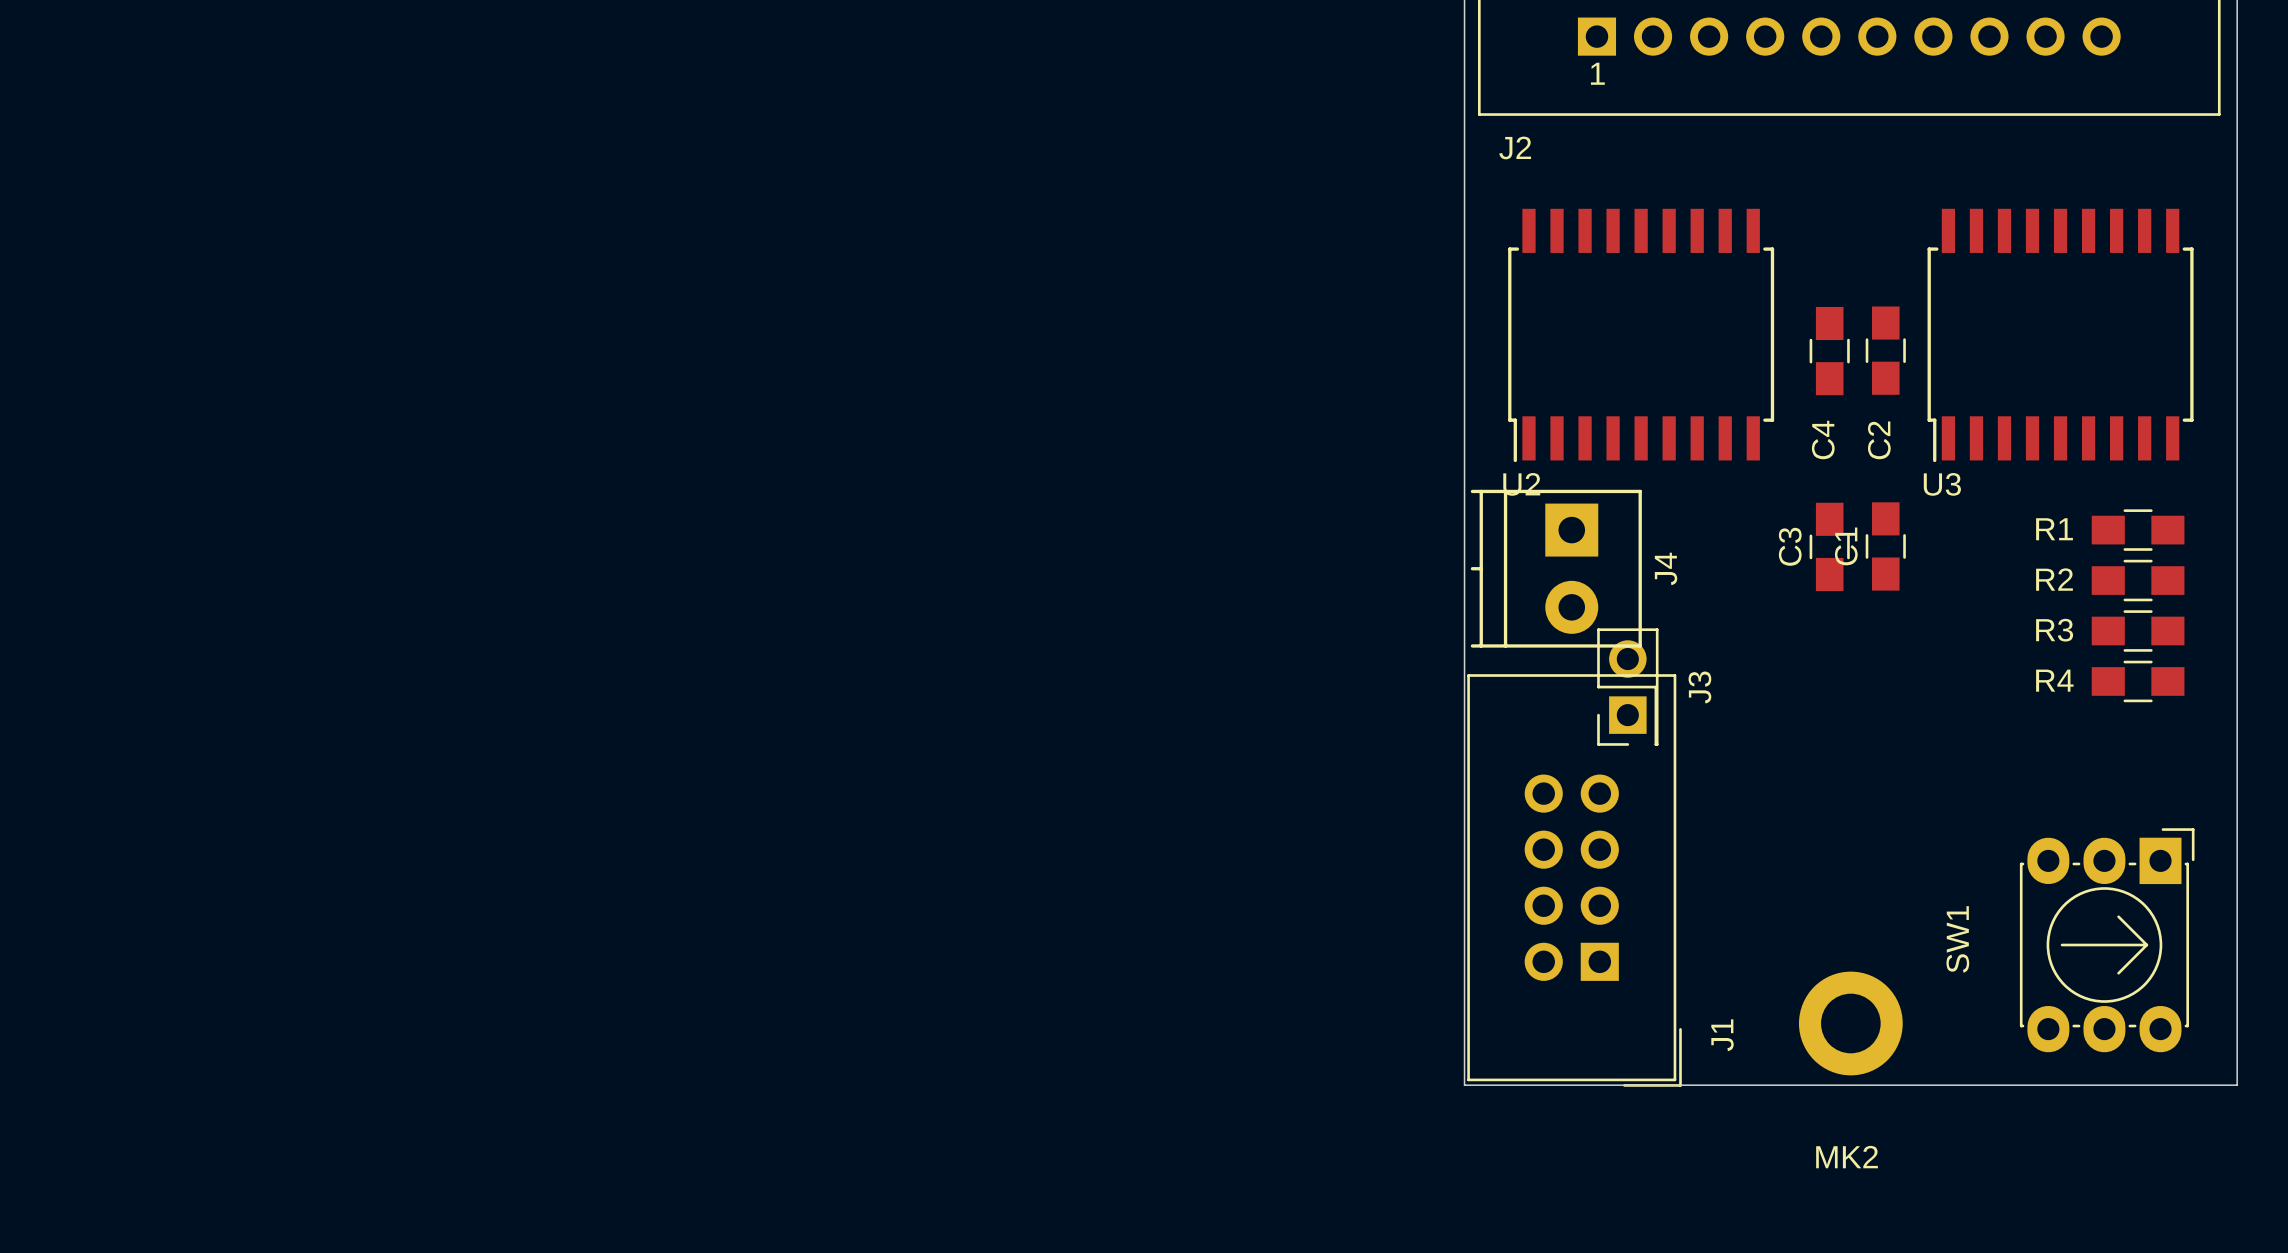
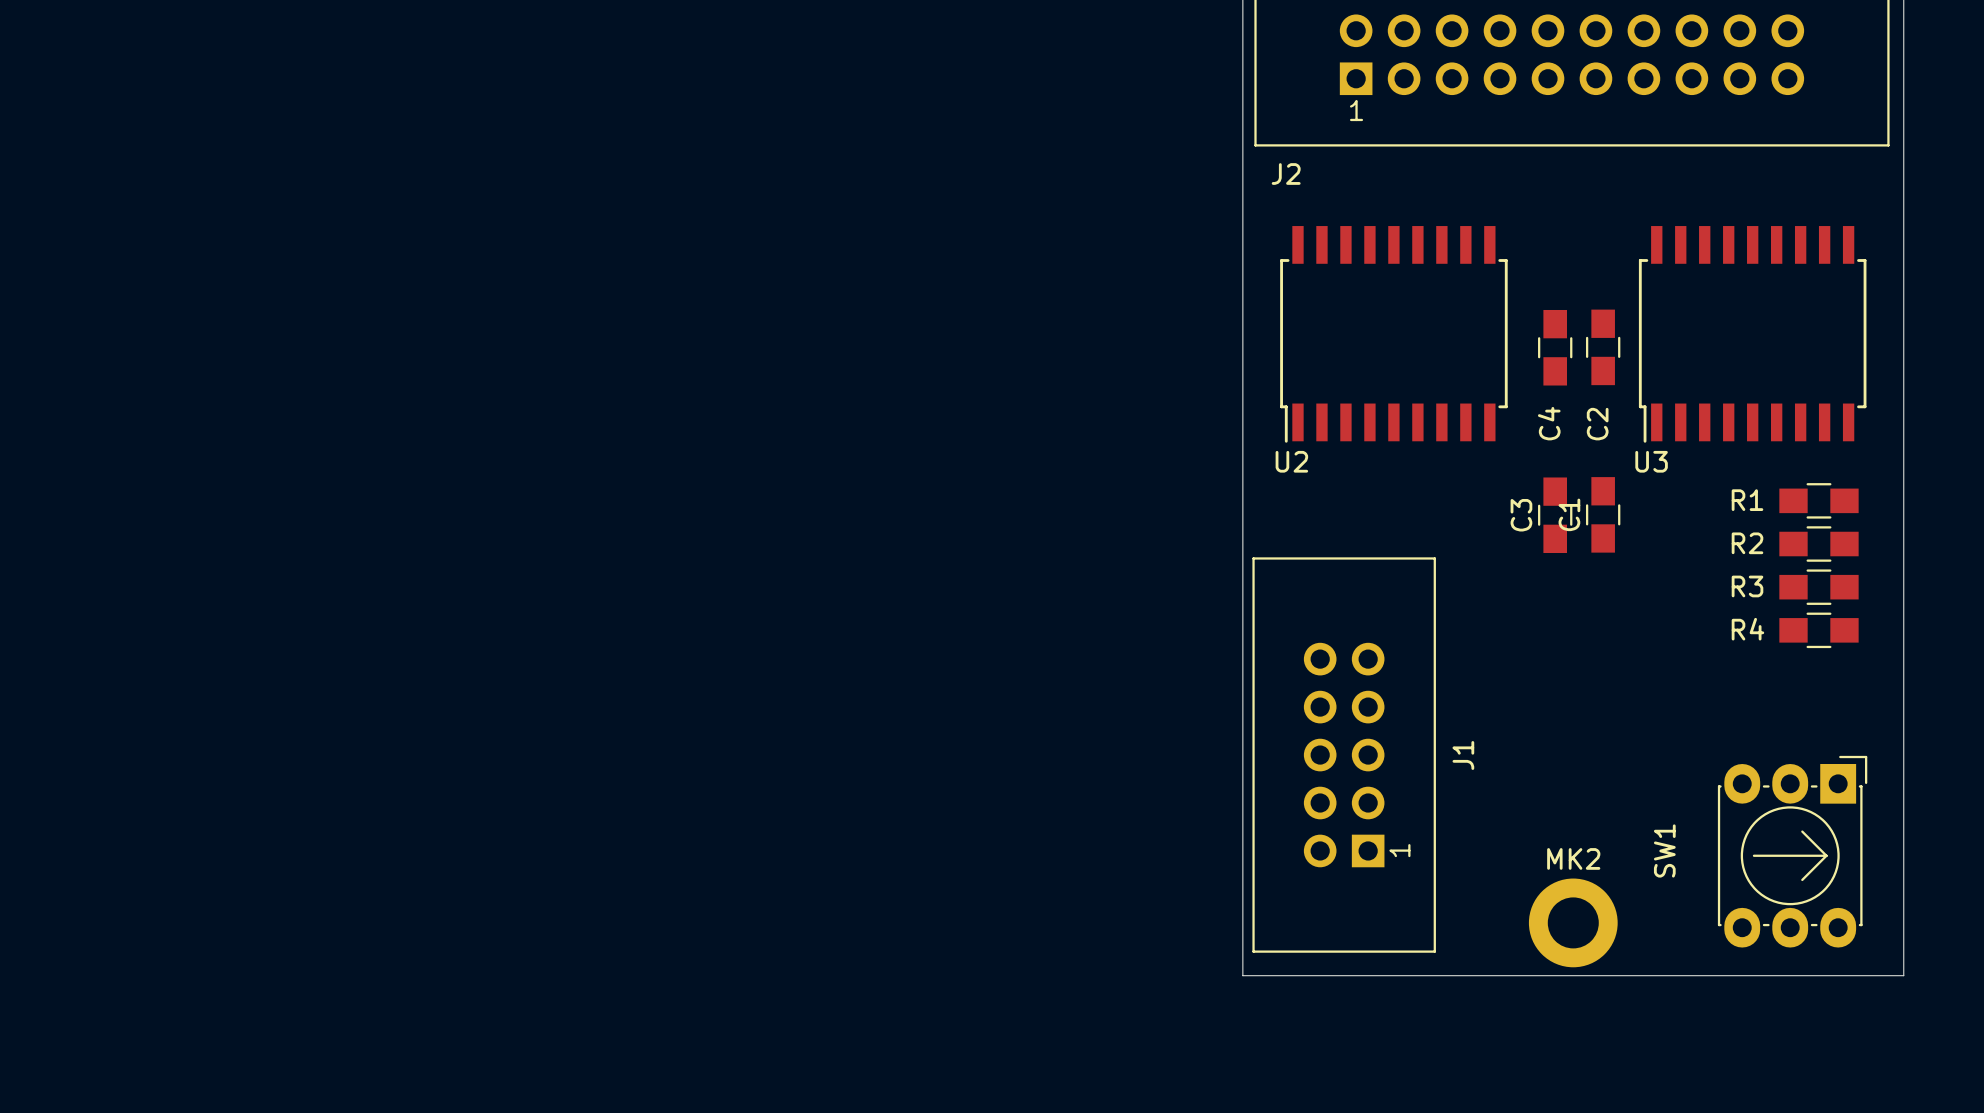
J4: (1556, 568) -> none
J1 footprint: [1467, 674, 1682, 1087] -> [1252, 557, 1436, 953]
J3: (1627, 687) -> none
J1 name position: J1 (1722, 1035) -> J1 (1463, 755)
MK2 name position: MK2 (1847, 1157) -> MK2 (1573, 858)

